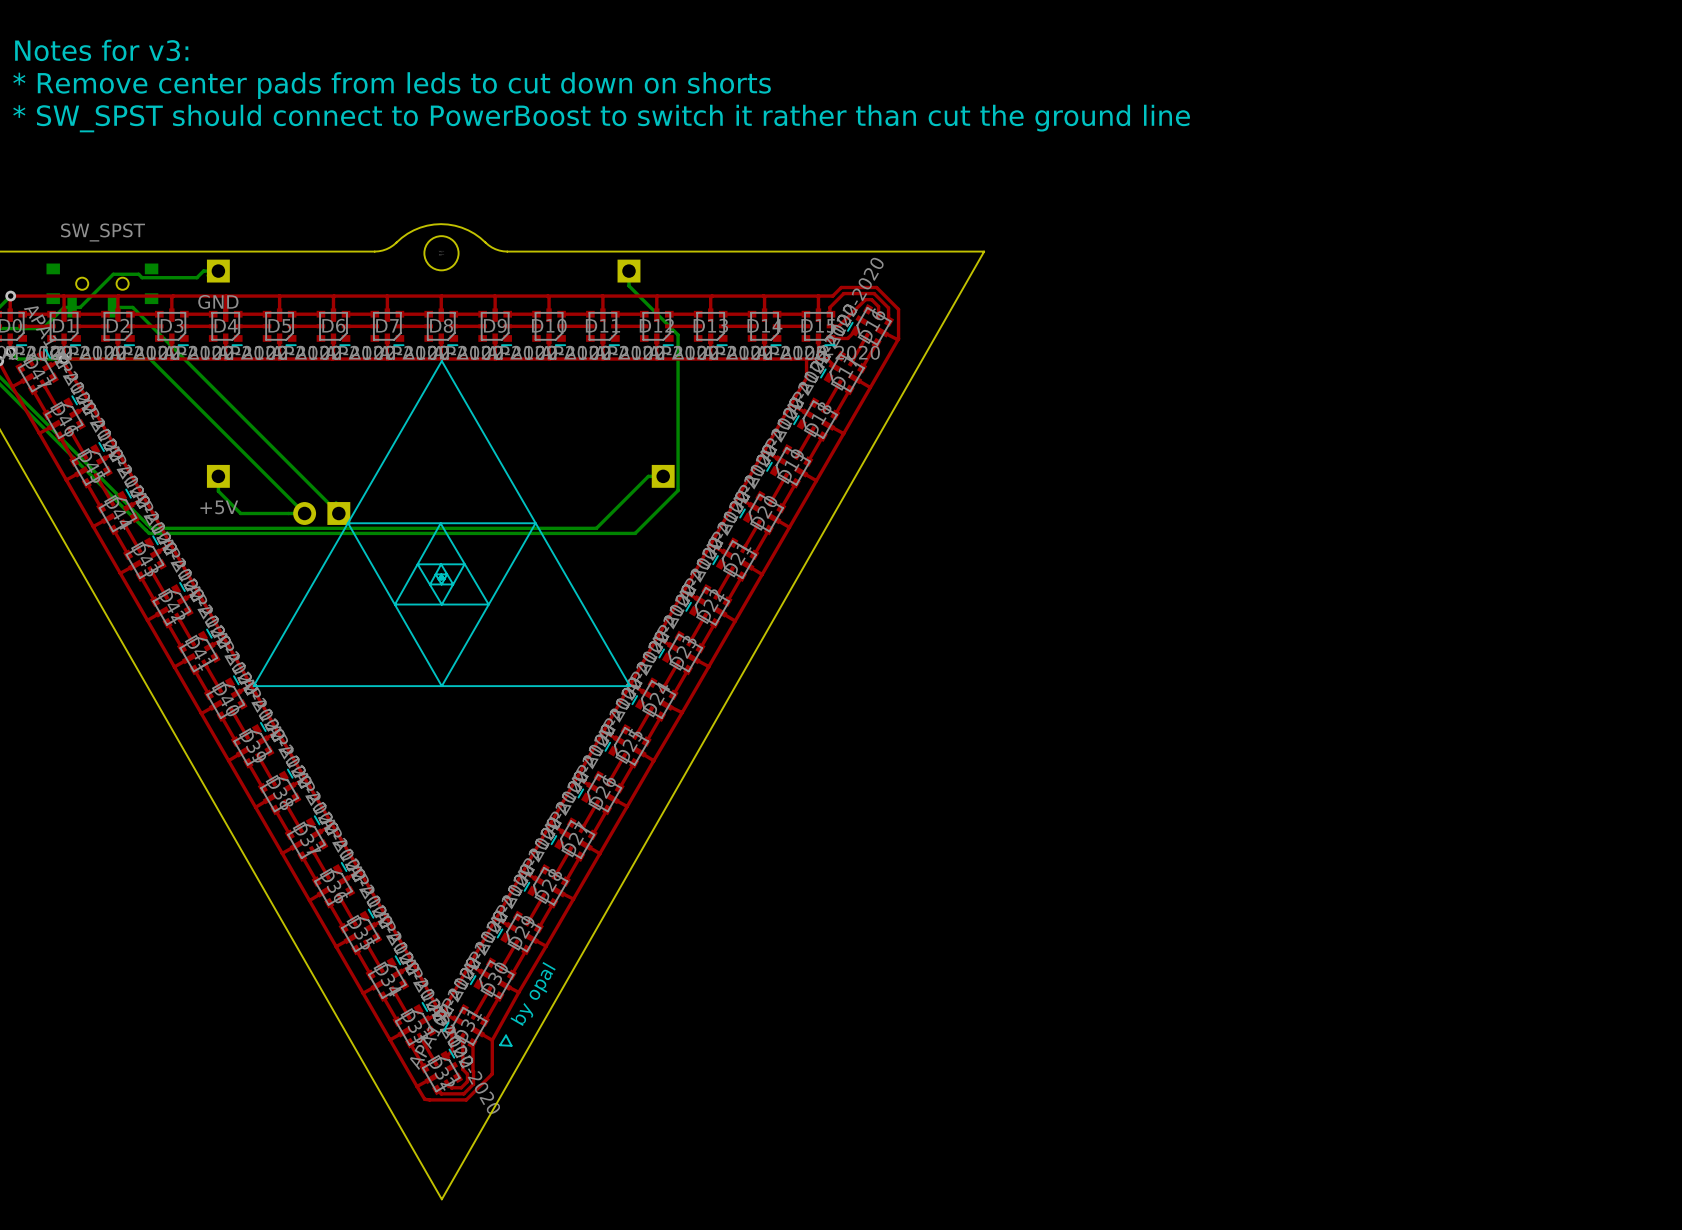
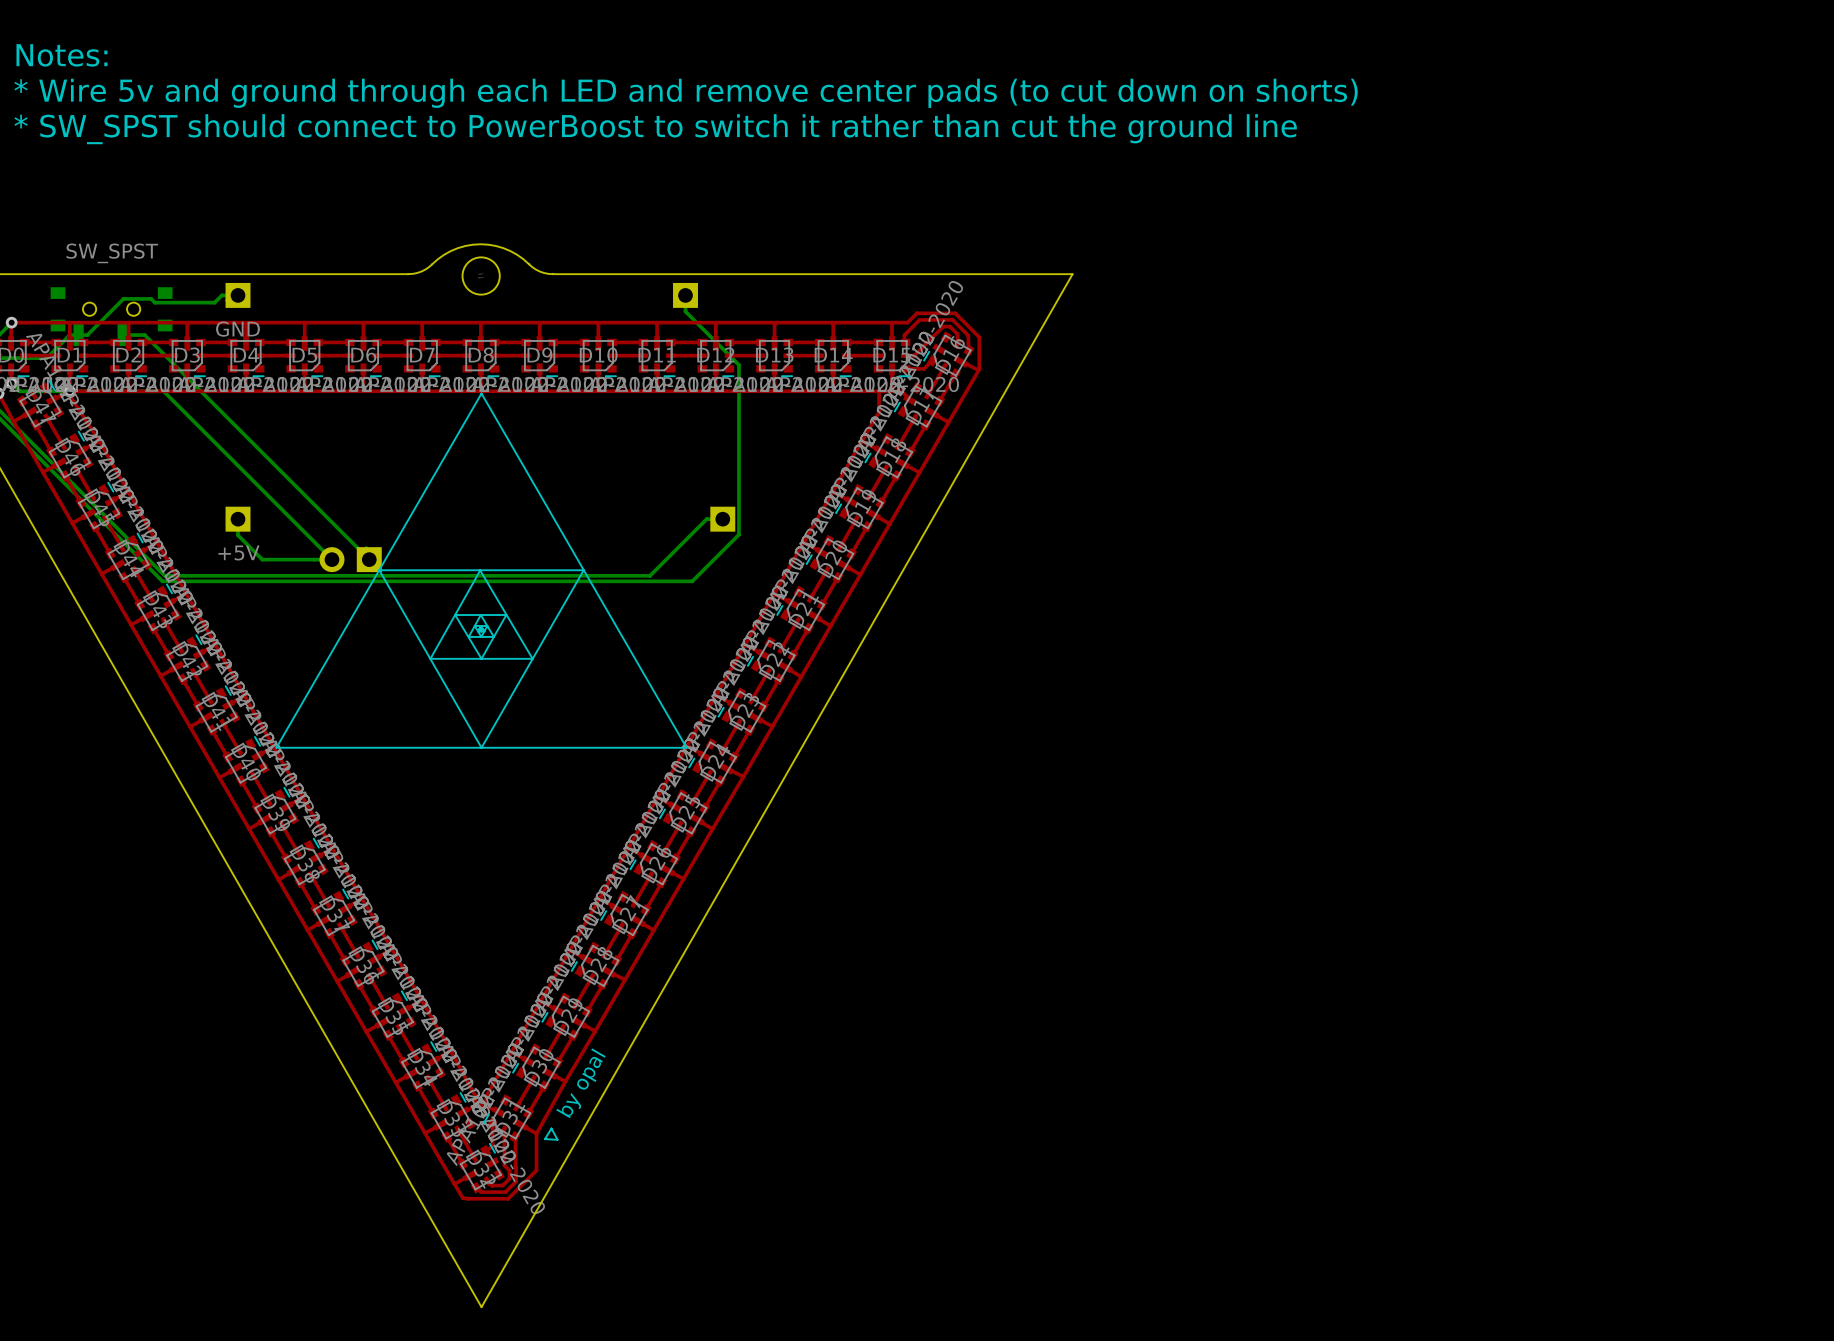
text: Notes for v3: (101, 50) -> Notes: (61, 55)
text: * Remove center pads from leds to cut down on shorts (392, 85) -> * Wire 5v and ground through each LED and remove center pads (to cut down on shorts) (686, 93)

